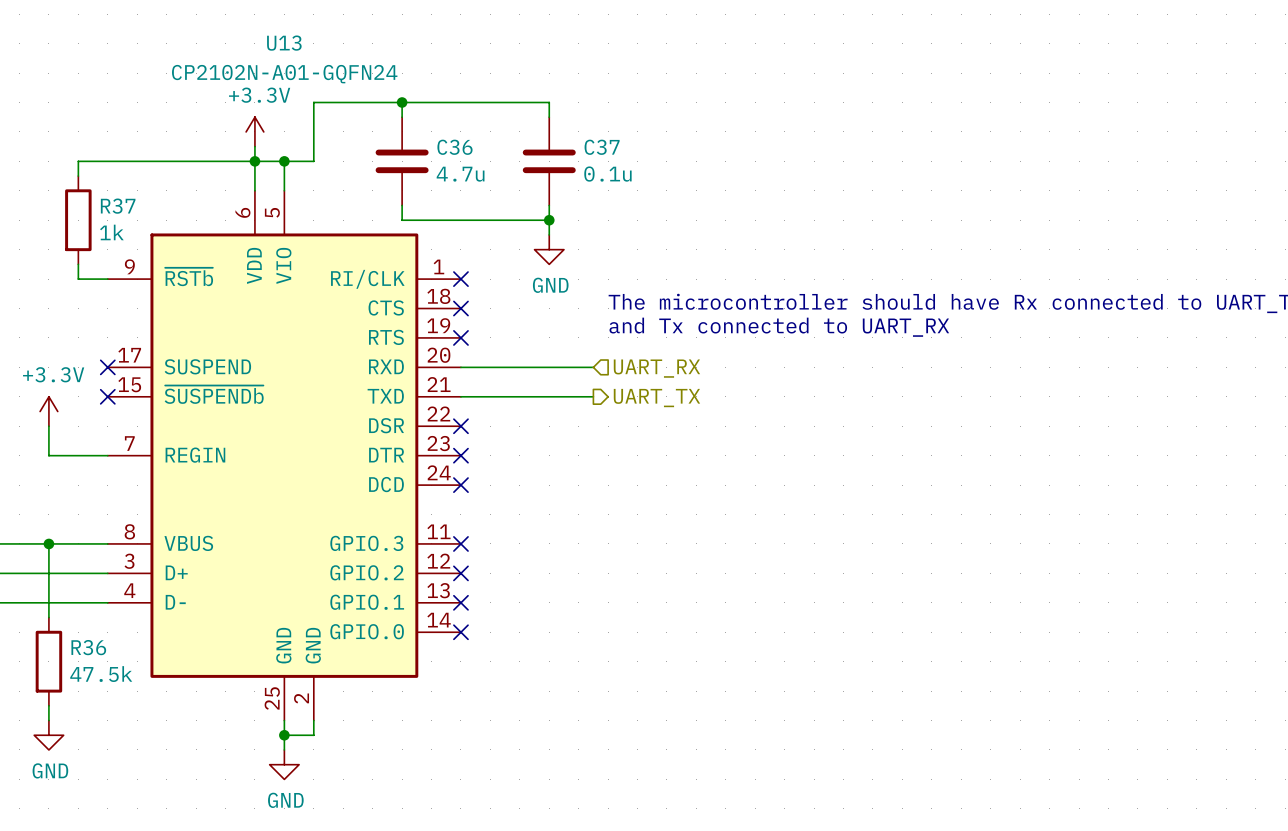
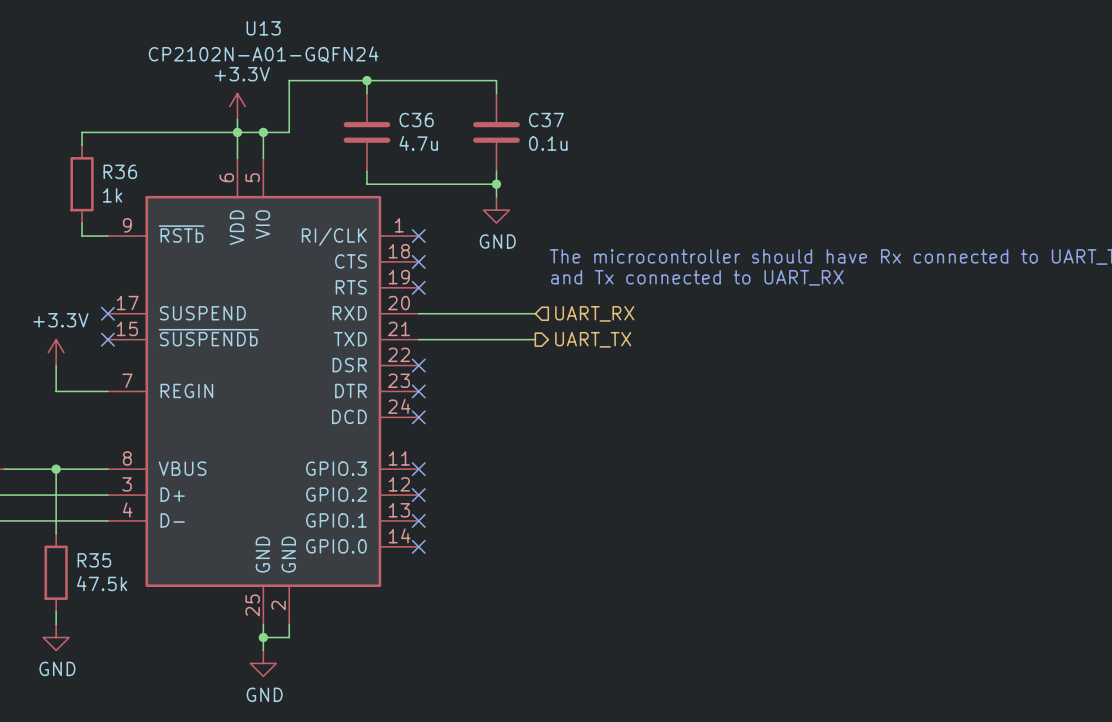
R37 name: R37 (118, 206) -> R36 (120, 171)
R36 name: R36 (88, 647) -> R35 (94, 560)

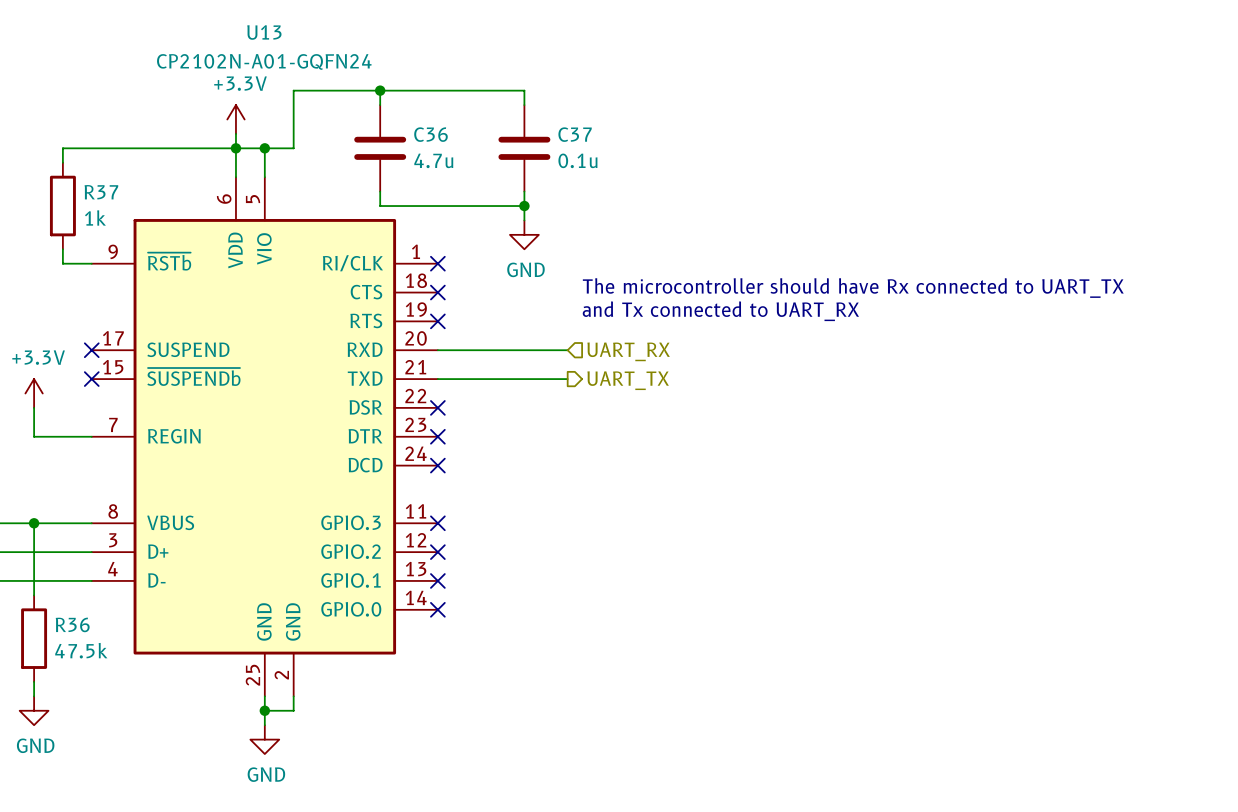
R36 name: R36 (120, 171) -> R37 (101, 192)
R35 name: R35 (94, 560) -> R36 (72, 624)

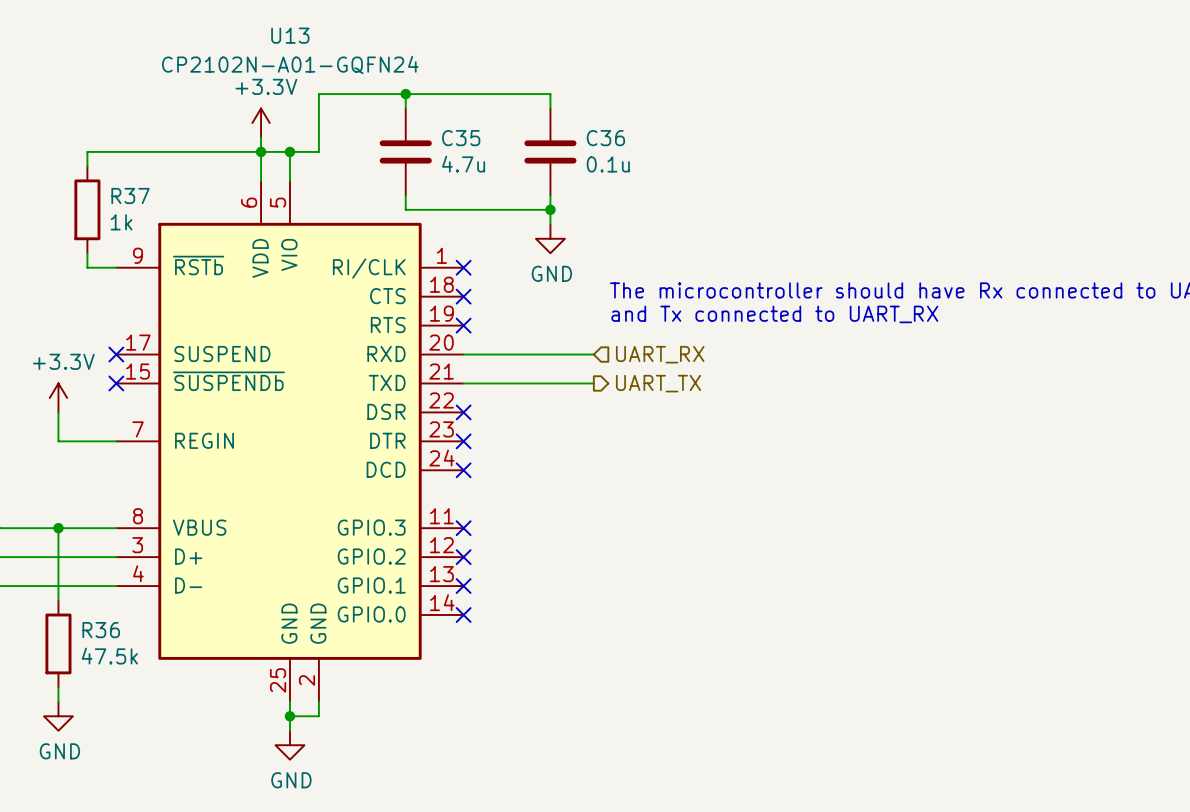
C36 name: C36 (430, 134) -> C35 (461, 138)
C37 name: C37 (575, 134) -> C36 (605, 138)

